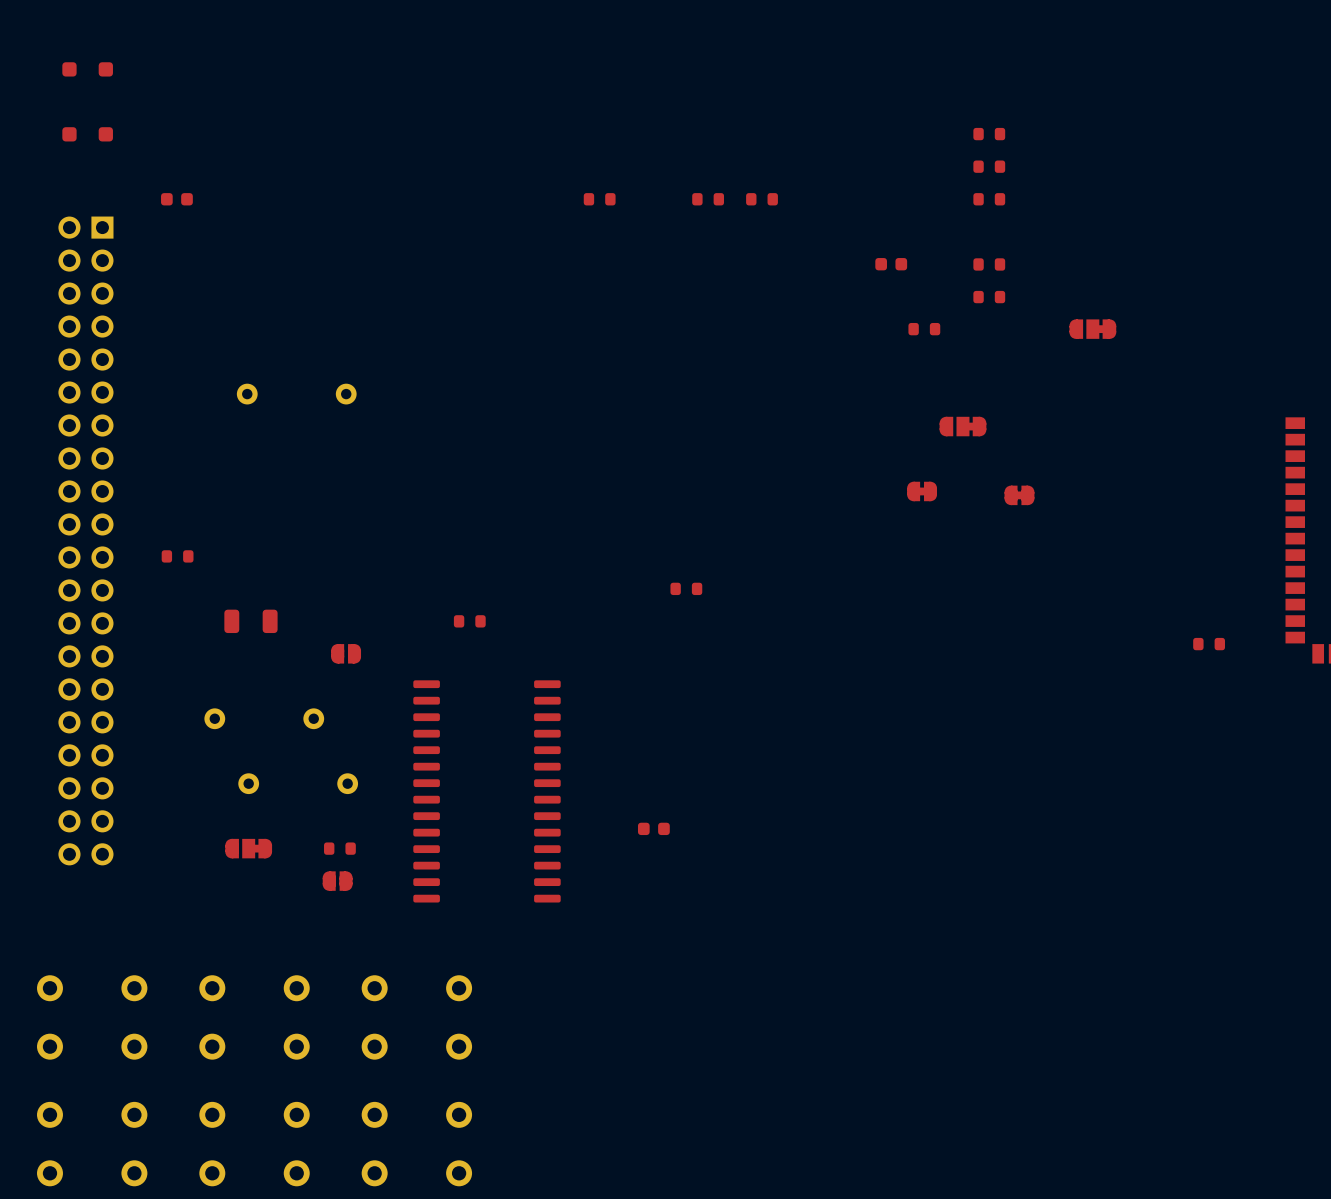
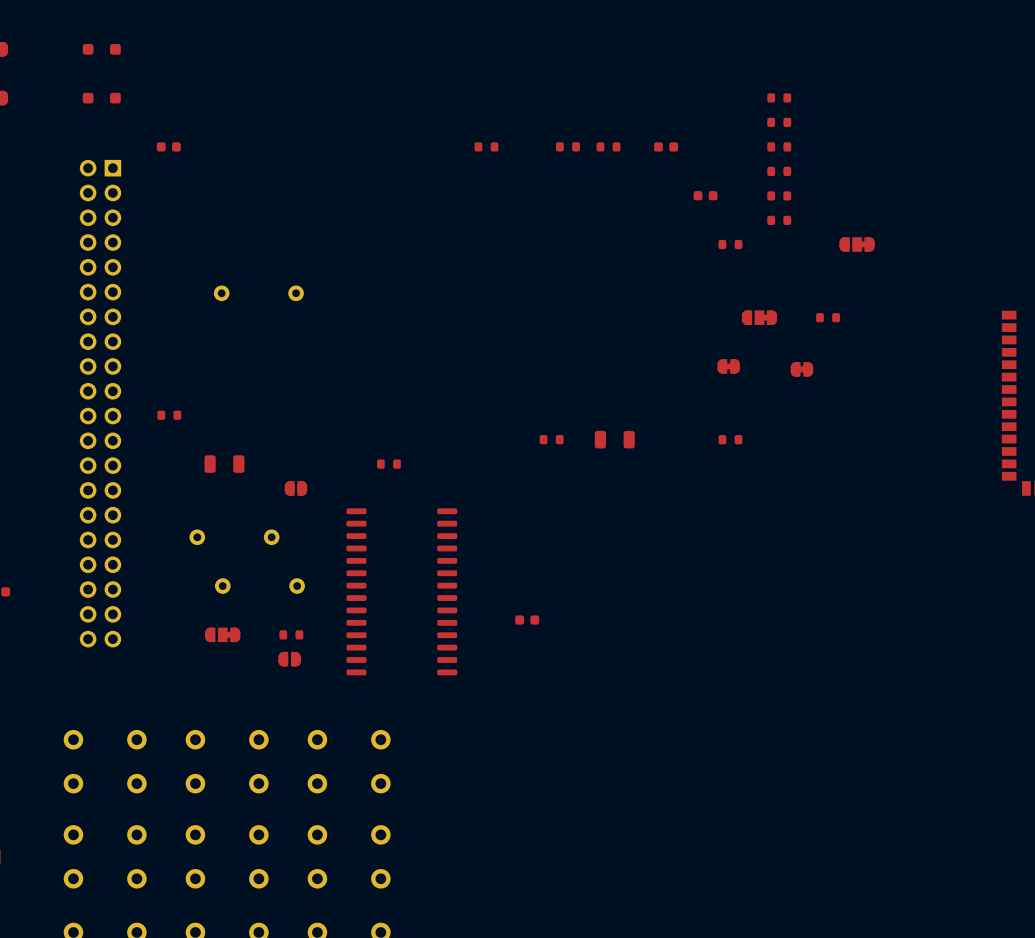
part: none -> (666, 146)
part: none -> (779, 171)
part: none -> (828, 317)
part: none -> (614, 439)
part: none -> (730, 439)
part: (1209, 644) -> none

